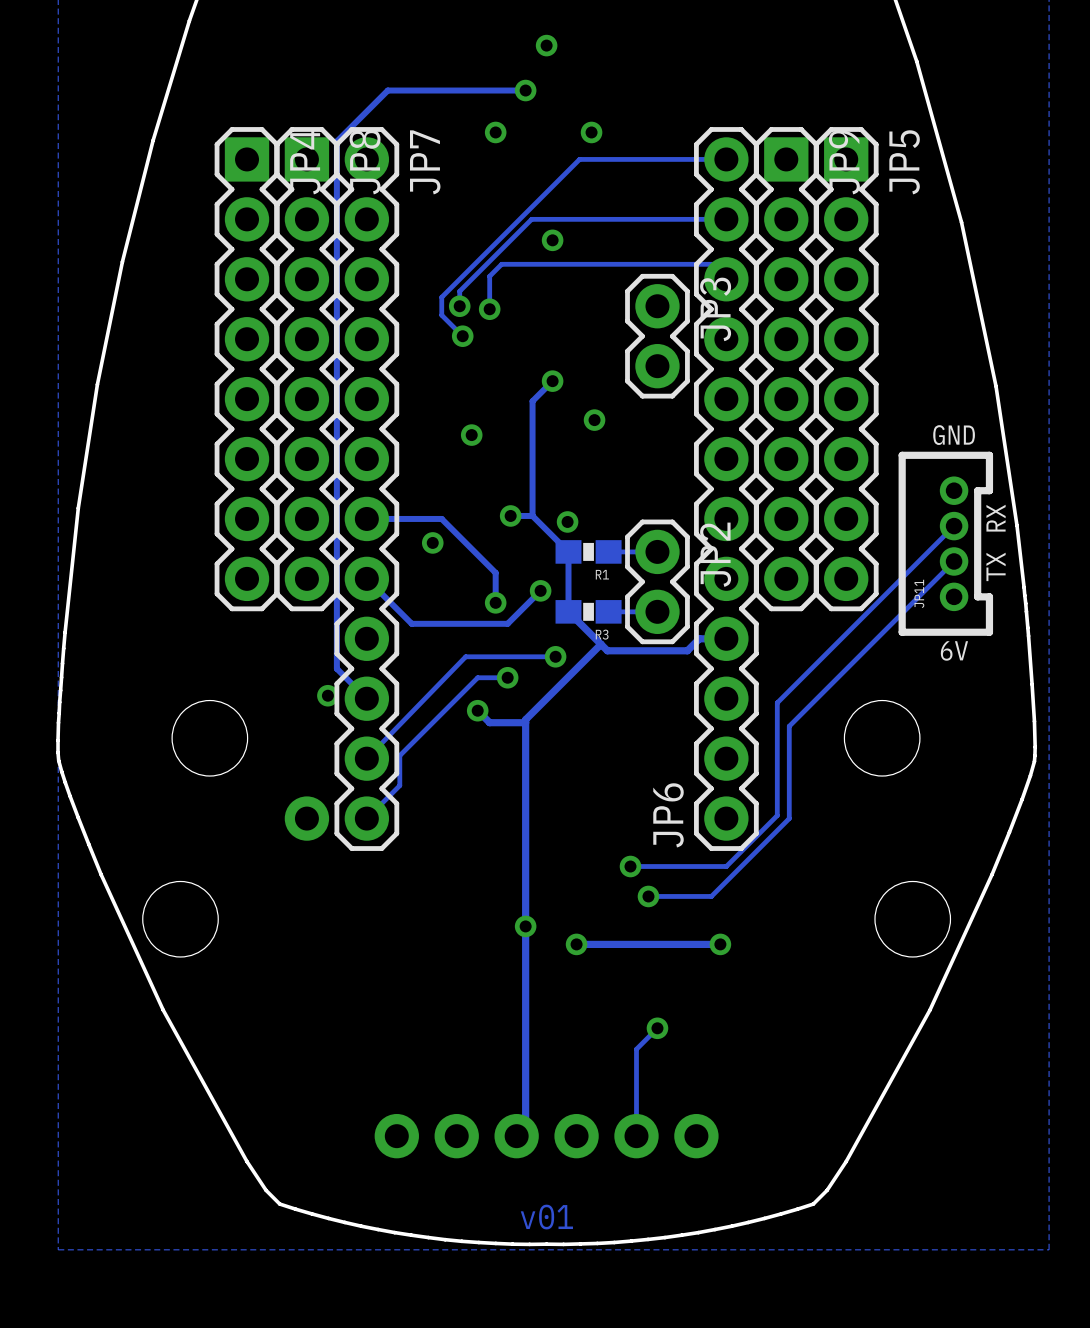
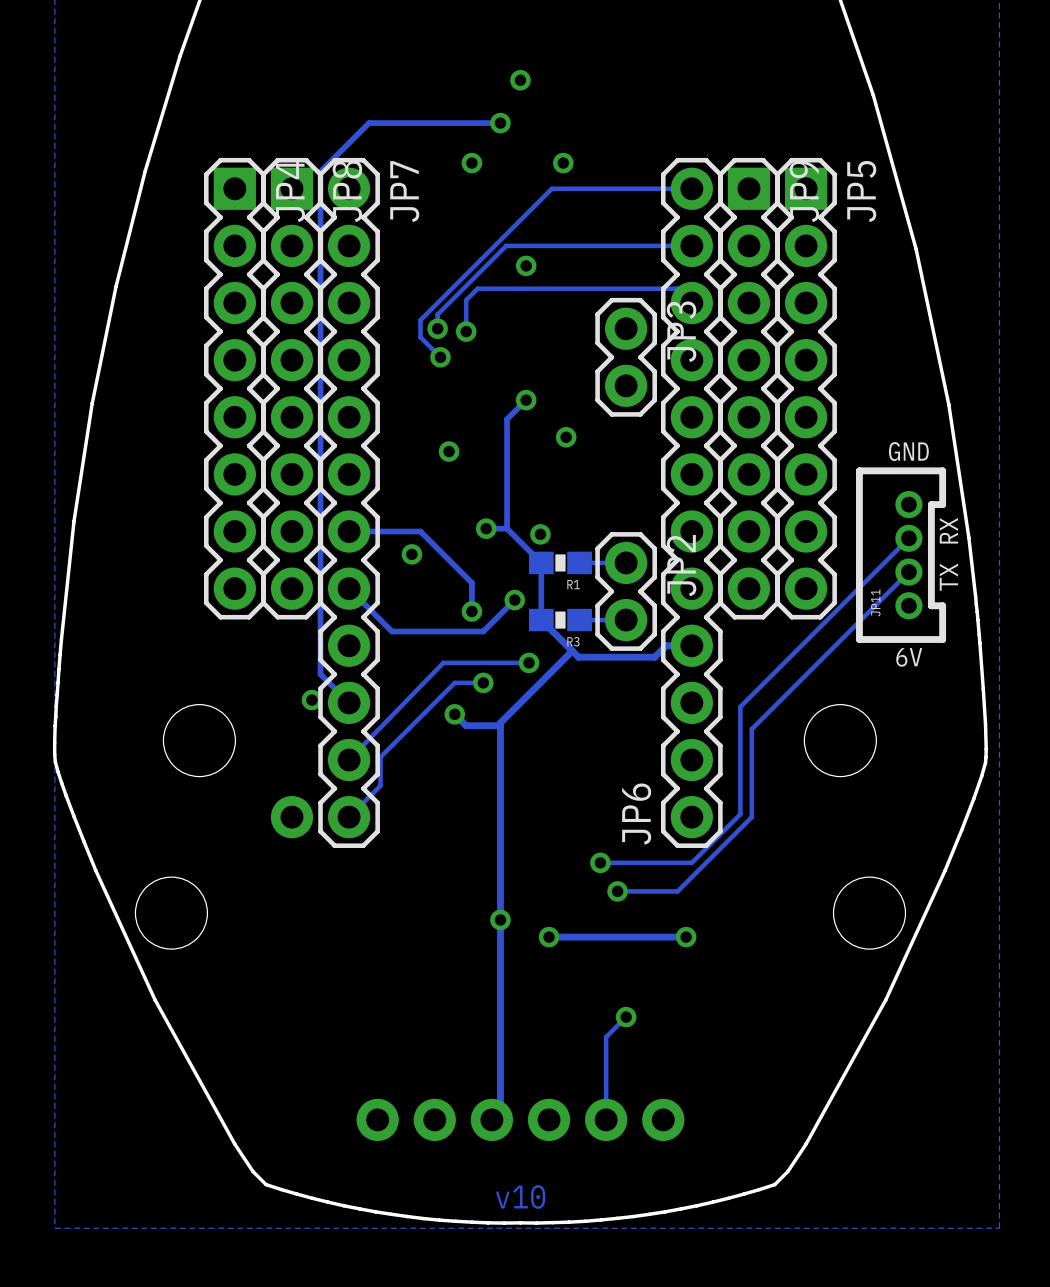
text: v01 (546, 1217) -> v10 (520, 1197)

